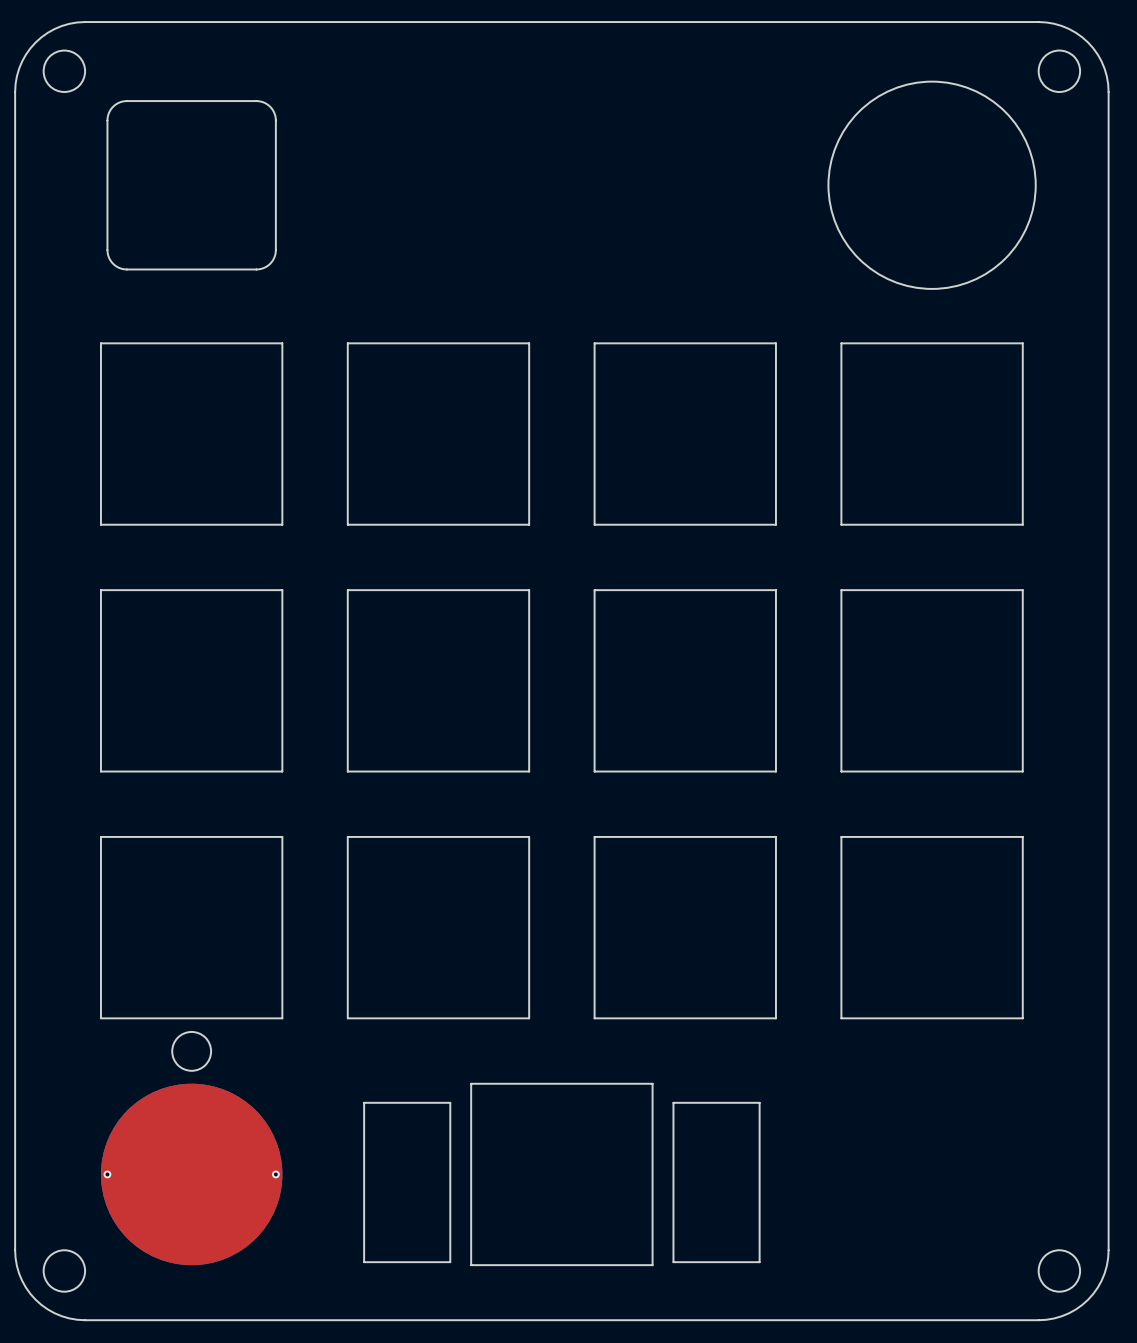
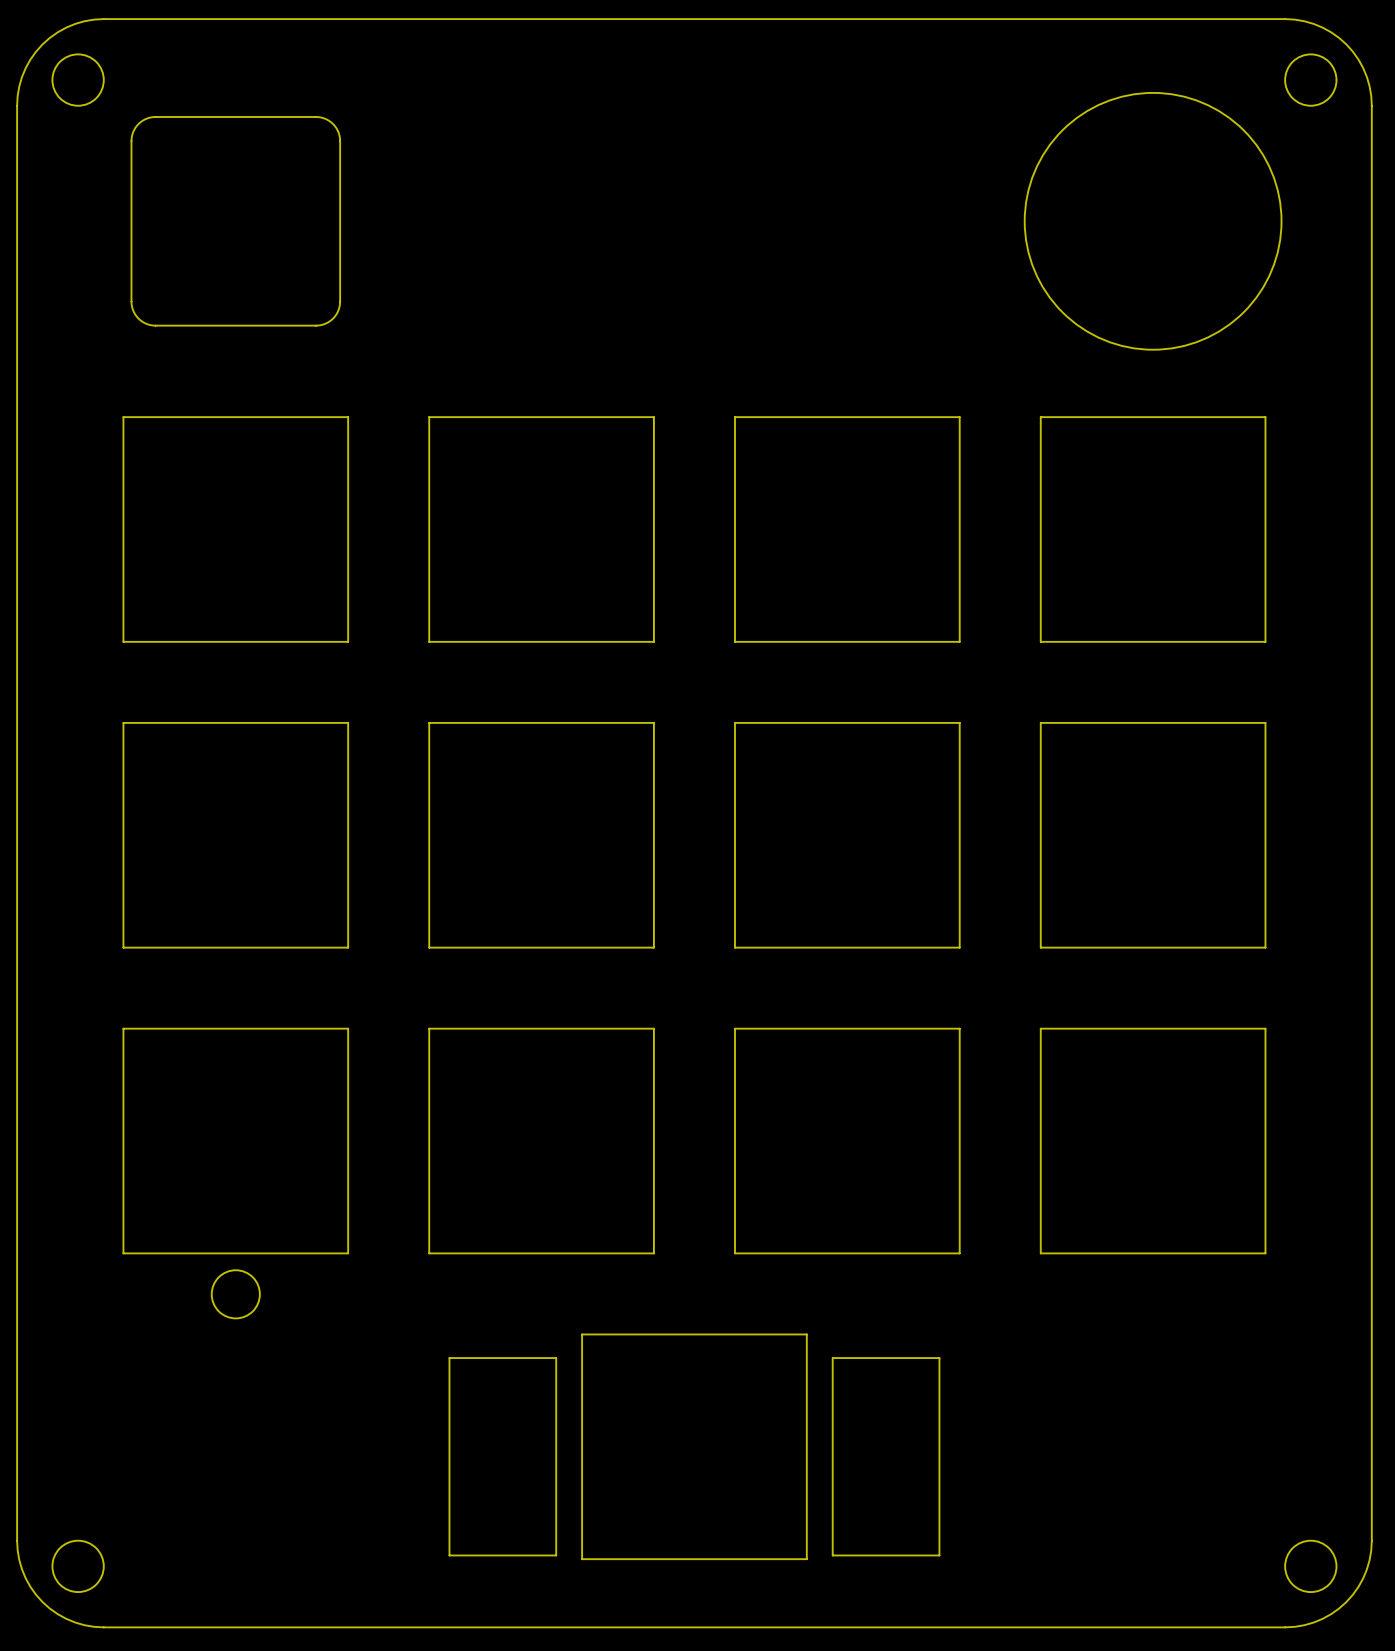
drawing: [100, 1083, 283, 1266] -> none
via: (107, 1174) -> none
via: (275, 1174) -> none

